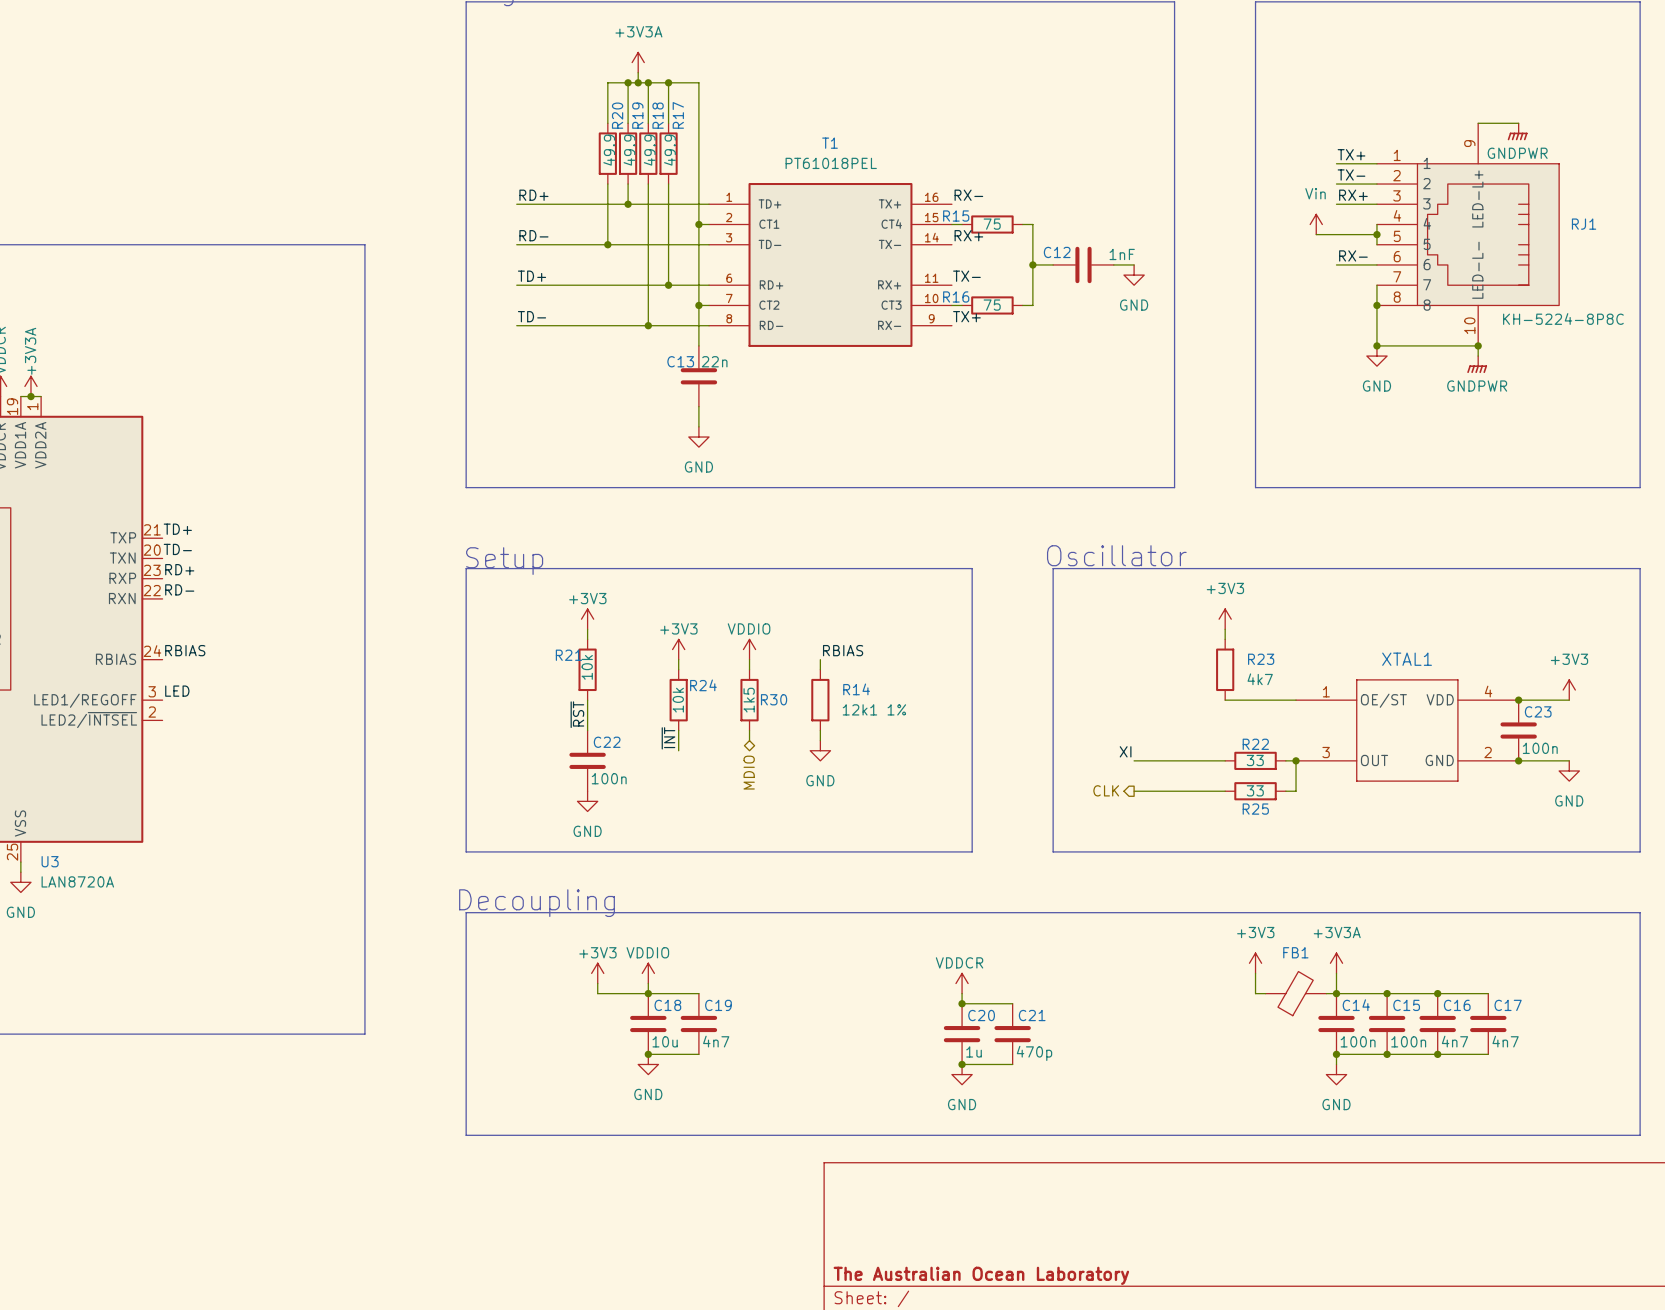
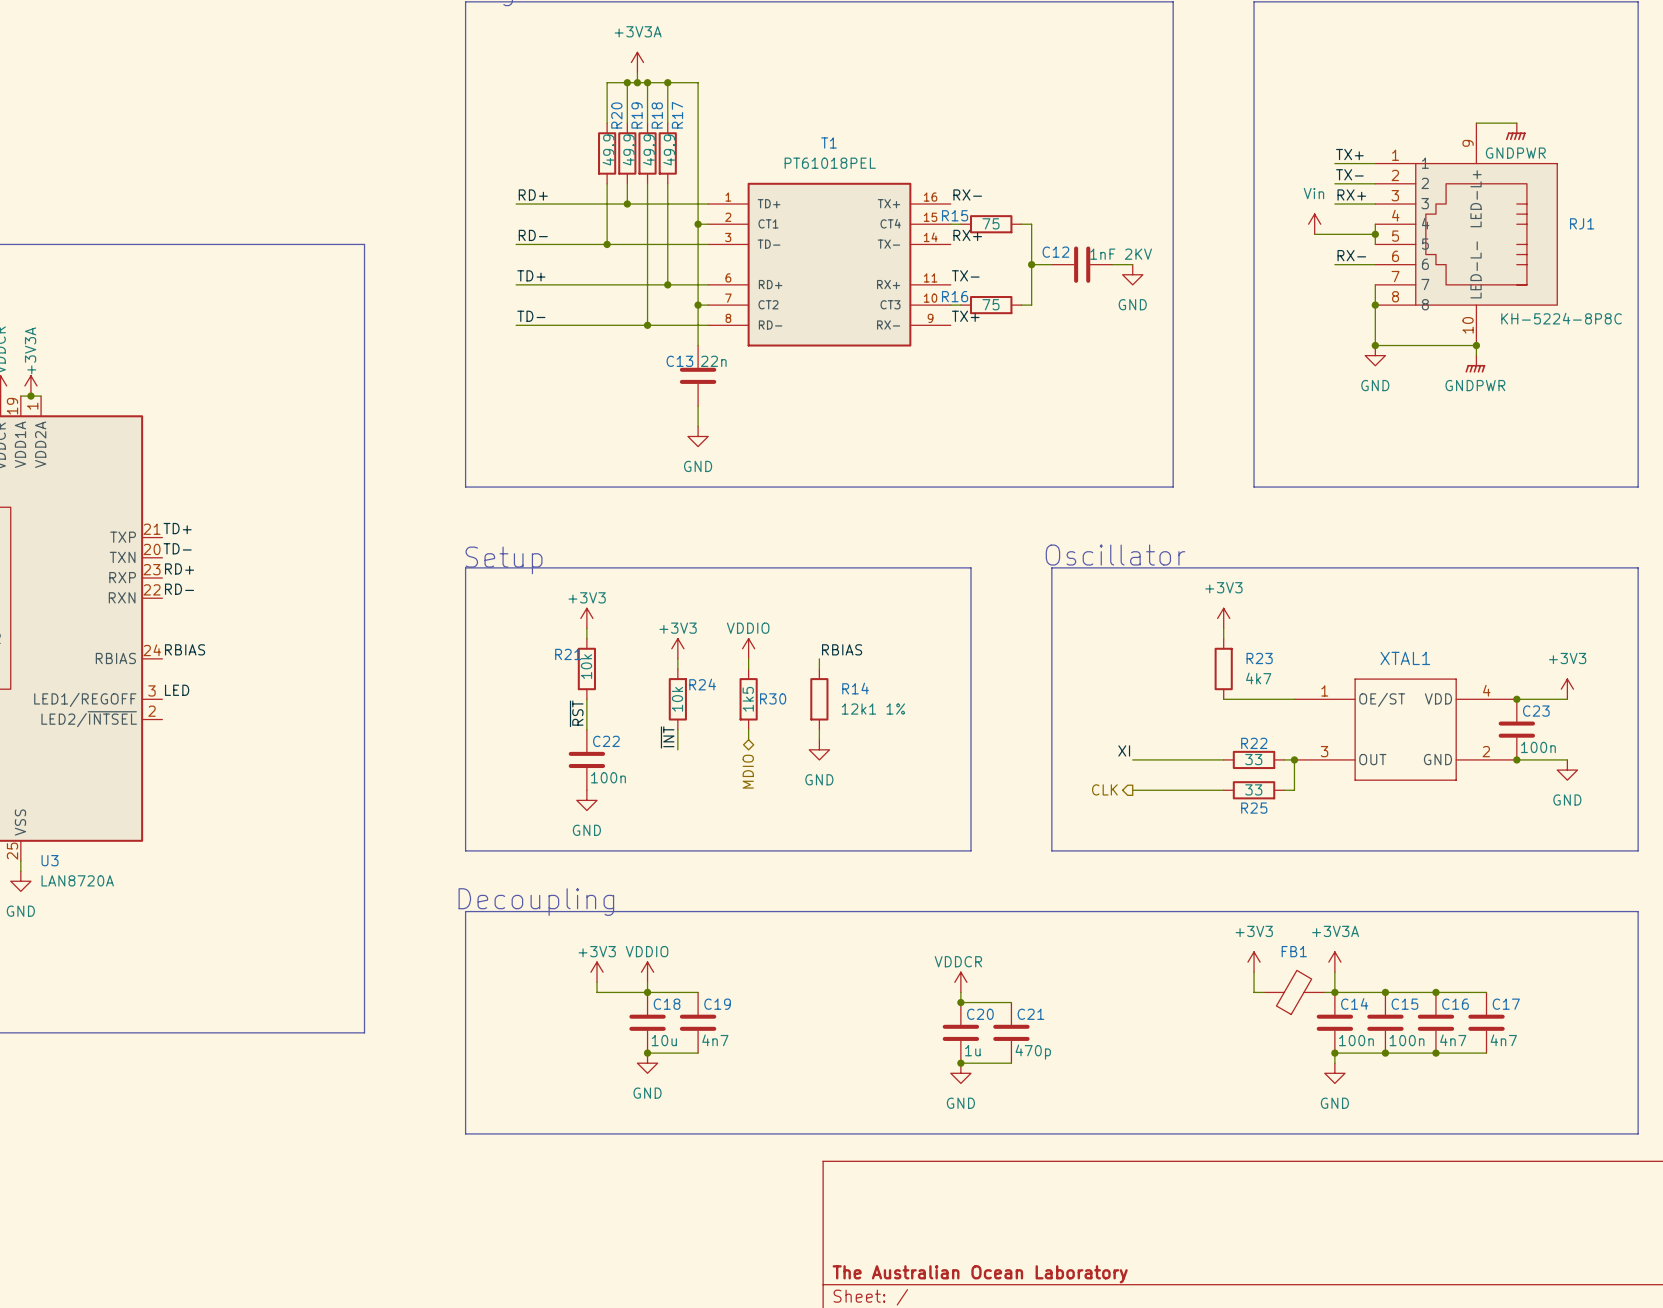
C12 value: 1nF (1122, 254) -> 1nF 2KV (1121, 254)

